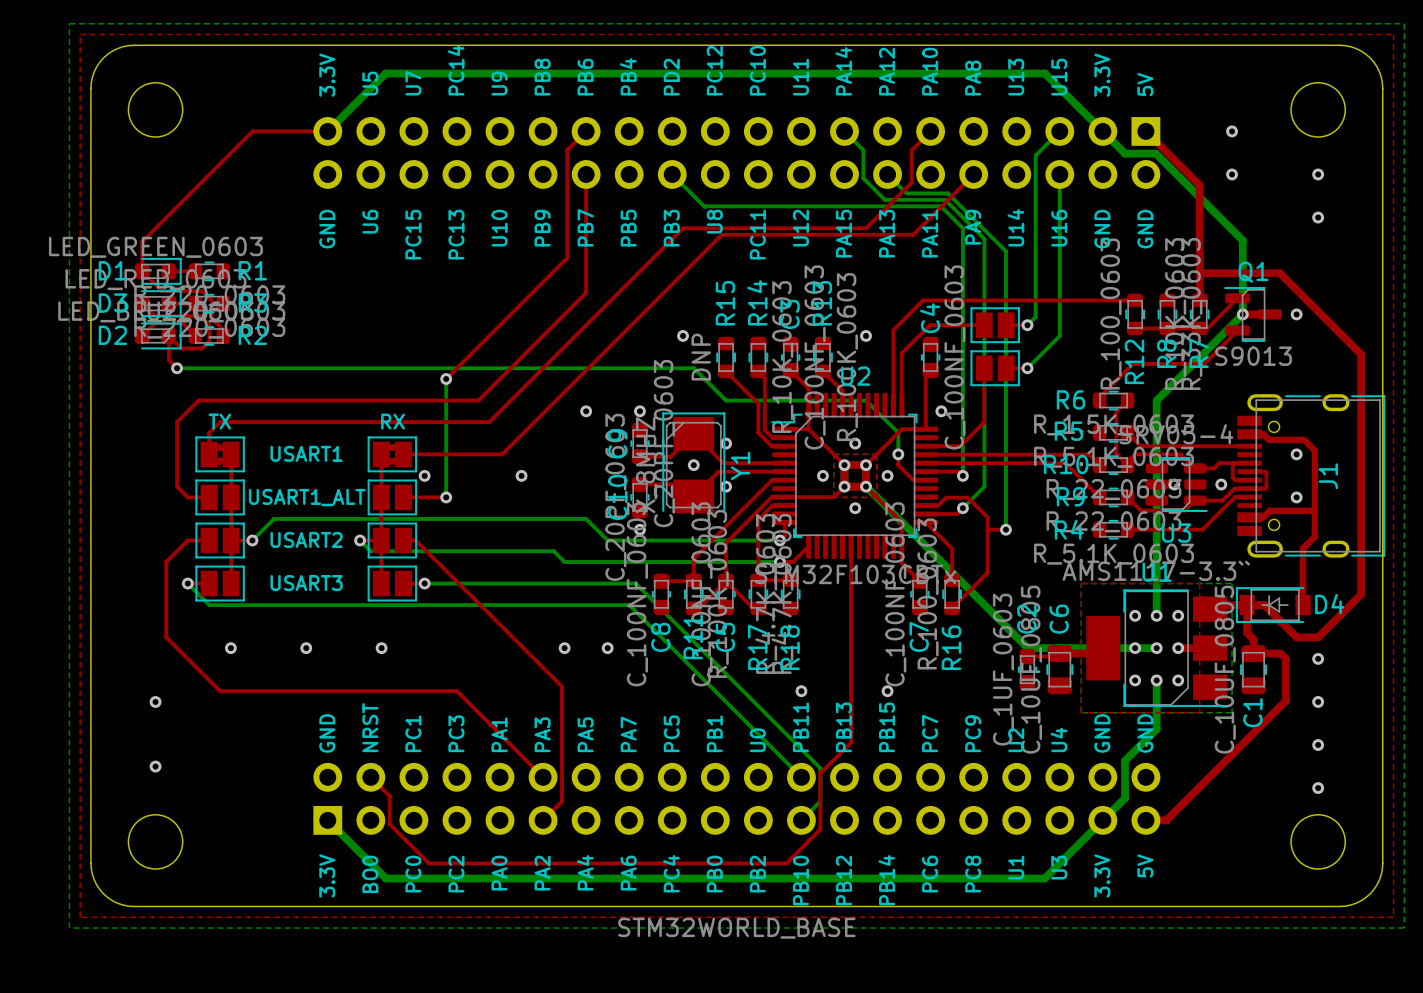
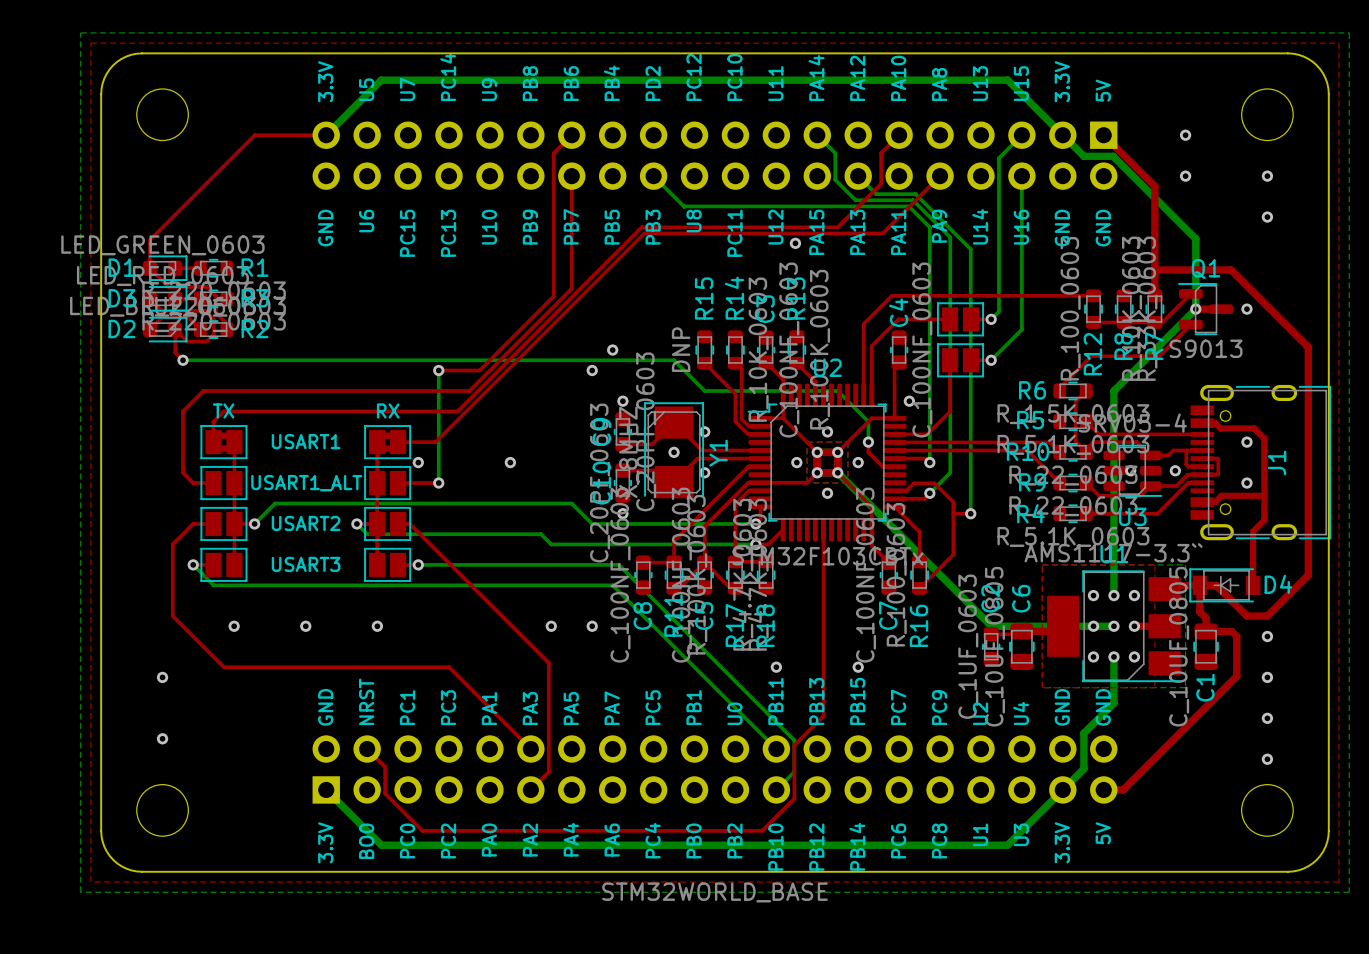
board edge: (134, 45) (1339, 45) (1356, 48) (1365, 54) (1376, 66) (1382, 88) (1382, 863) (1379, 879) (1373, 889) (1361, 900) (1339, 906) (134, 906) (122, 905) (107, 897) (94, 879) (90, 863) (90, 88) (94, 71) (103, 57) (117, 48) (134, 45) -> none
part footprint: [128, 82, 1346, 870] -> [100, 52, 1330, 873]
top track: (683, 228) (489, 422) (466, 422) -> (663, 227) (641, 227) (457, 411)
top track: (721, 234) (502, 454) (442, 454) -> (700, 233) (644, 233) (435, 442)
via: none -> (795, 243)
top track: (567, 258) (446, 379) -> (553, 255) (553, 296) (479, 370) (438, 370)
via: (683, 335) -> none
via: (866, 335) -> none
via: none -> (612, 350)
via: none -> (592, 370)
via: (586, 411) -> none

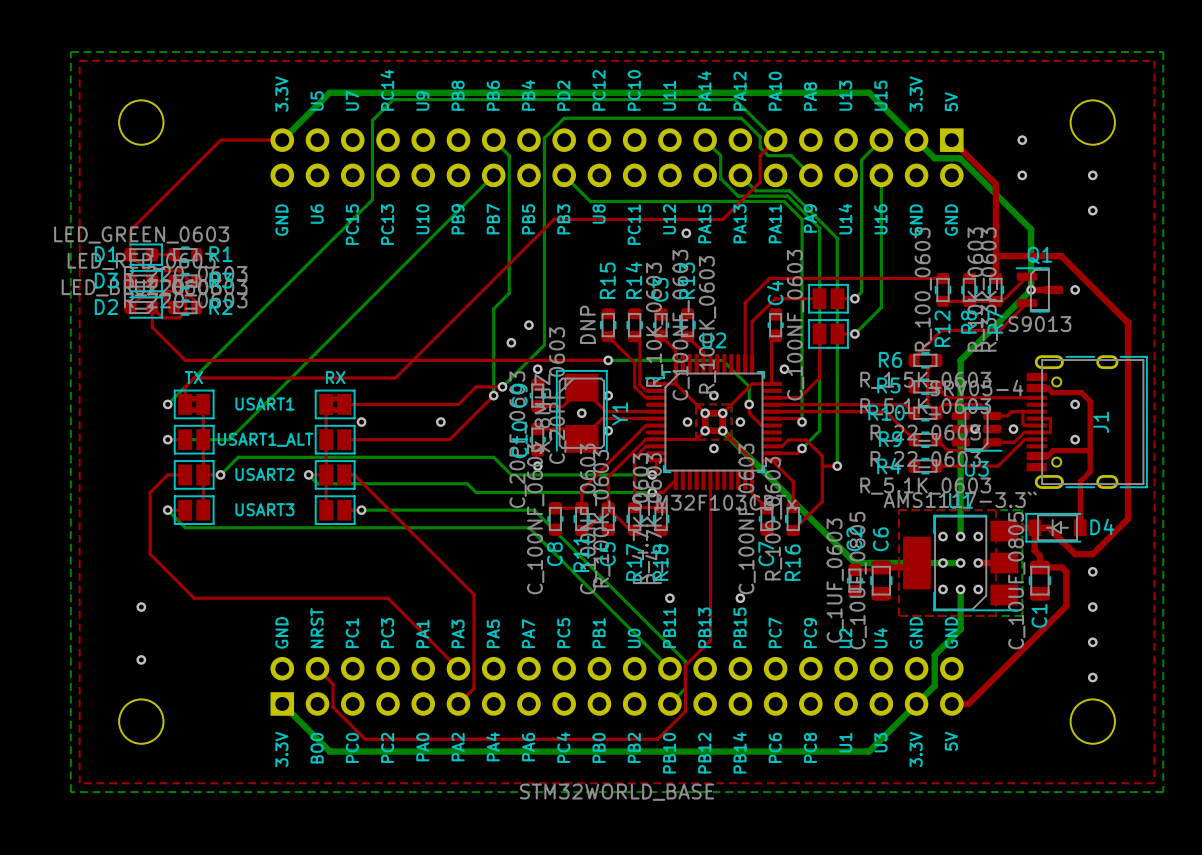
part footprint: [100, 52, 1330, 873] -> [119, 100, 1115, 744]
top track: (571, 135) (553, 153) (553, 296) (479, 370) (438, 370) -> none
bottom track: none -> (493, 140) (509, 155) (509, 293) (493, 308) (493, 395)
bottom track: none -> (775, 140) (735, 99) (393, 99) (372, 120) (372, 199) (167, 404)
top track: (571, 176) (571, 288) (469, 390) -> (608, 360) (405, 360)
bottom track: none -> (493, 175) (229, 439) (167, 439)
top track: (940, 176) (882, 233) (644, 233) (435, 442) -> (502, 386) (476, 386) (458, 404) (376, 404)
bottom track: none -> (810, 175) (791, 155) (768, 155) (760, 147) (760, 136) (741, 118) (564, 118) (544, 137) (544, 344) (502, 386)
bottom track: (183, 360) (674, 360) (704, 390) -> none
via: (183, 360) -> none
bottom track: (438, 370) (438, 483) -> none
via: (438, 370) -> none
top track: (213, 390) (203, 390) (183, 411) (183, 472) (193, 483) -> (185, 360) (158, 333)
via: none -> (608, 360)
via: none -> (502, 386)
top track: none -> (493, 395) (449, 439) (379, 439)
via: none -> (493, 395)
via: none -> (167, 404)
via: none -> (167, 439)
via: (438, 483) -> none
via: (234, 626) -> none
via: (305, 626) -> none
via: (377, 626) -> none
via: (551, 626) -> none
via: (592, 626) -> none

